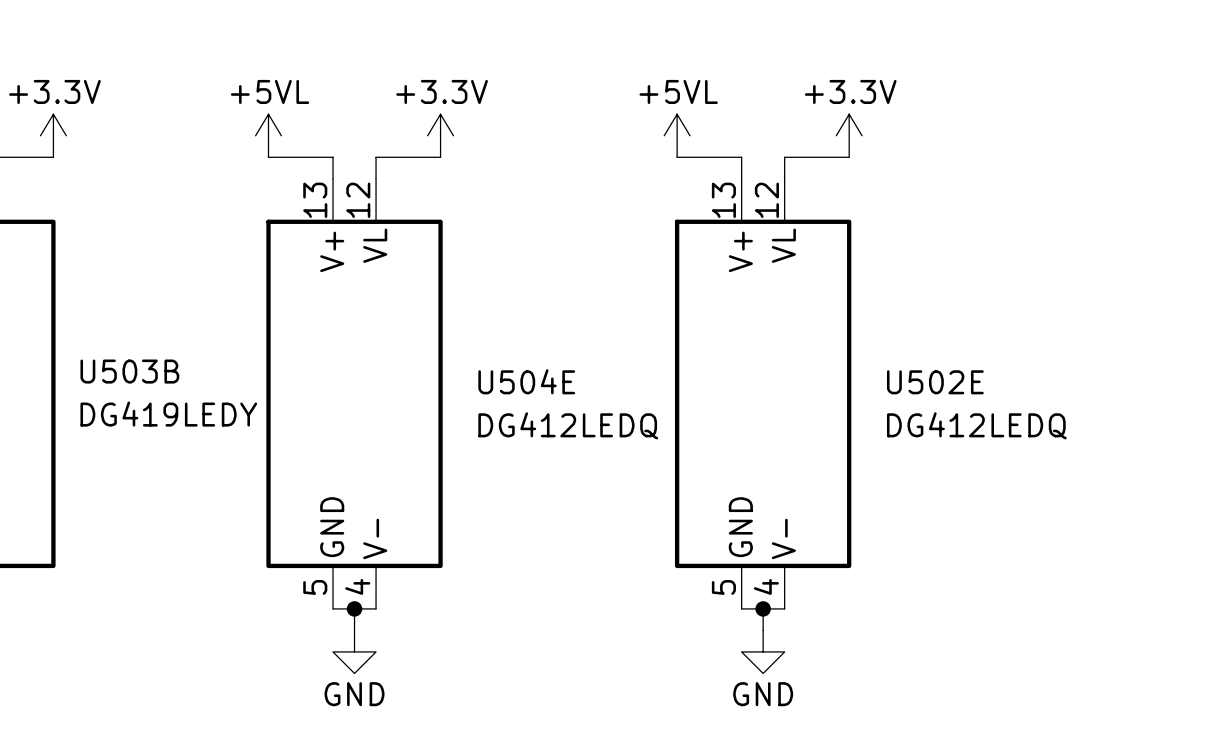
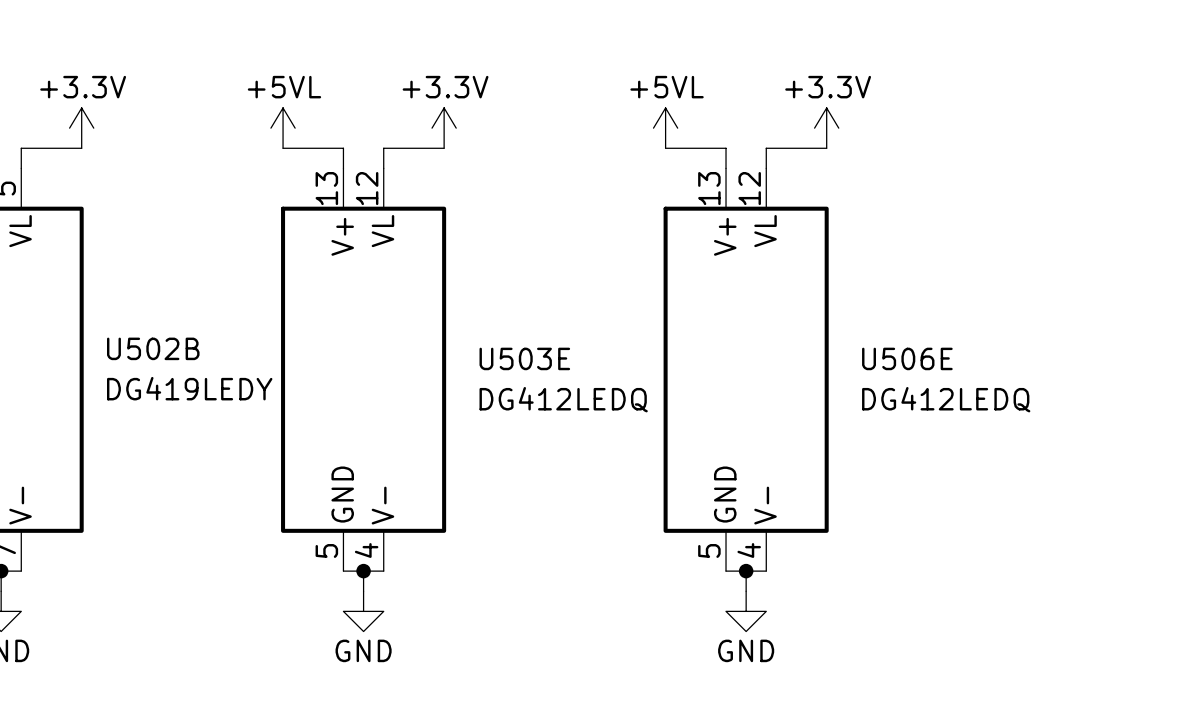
U503B name: U503B (129, 371) -> U502B (153, 348)
U504E name: U504E (526, 381) -> U503E (524, 358)
U502E name: U502E (935, 382) -> U506E (907, 358)

